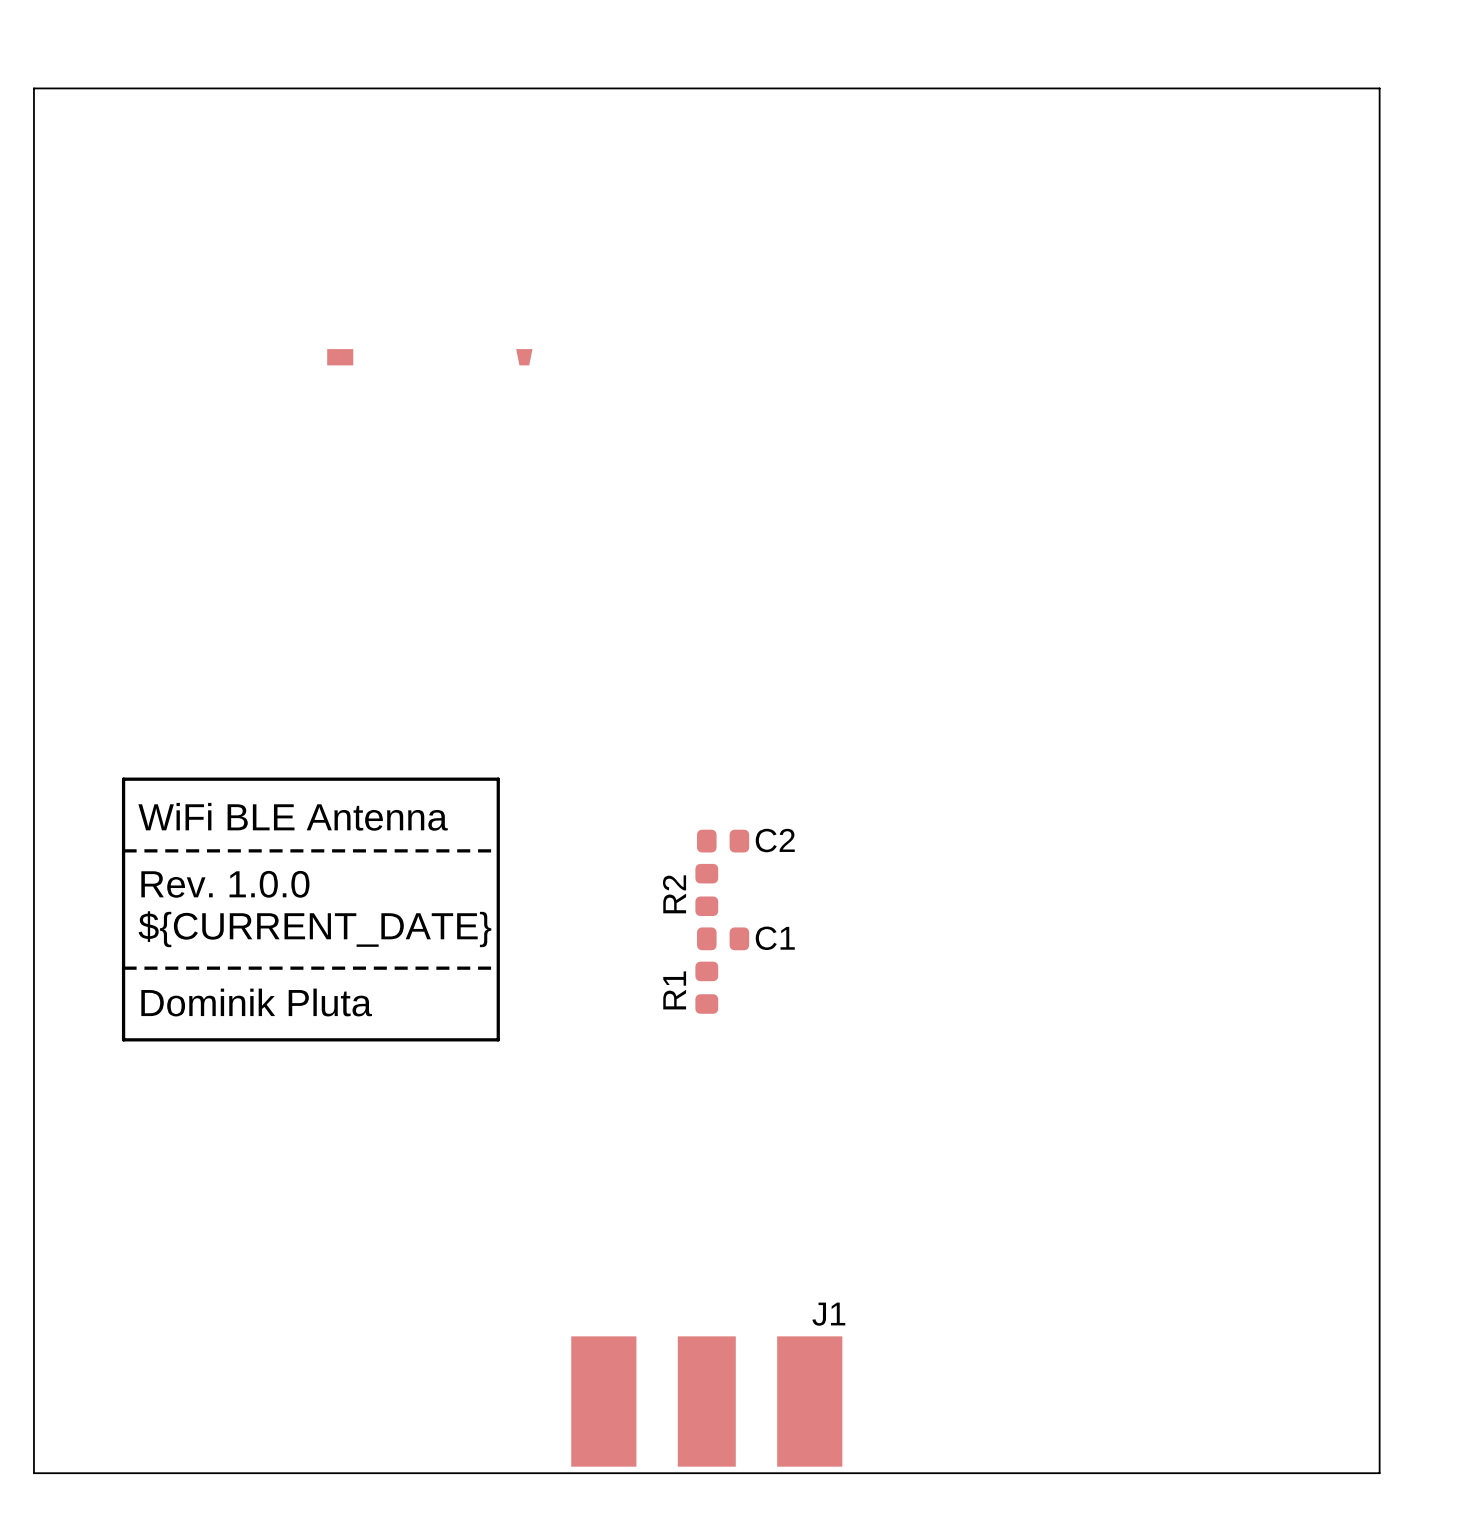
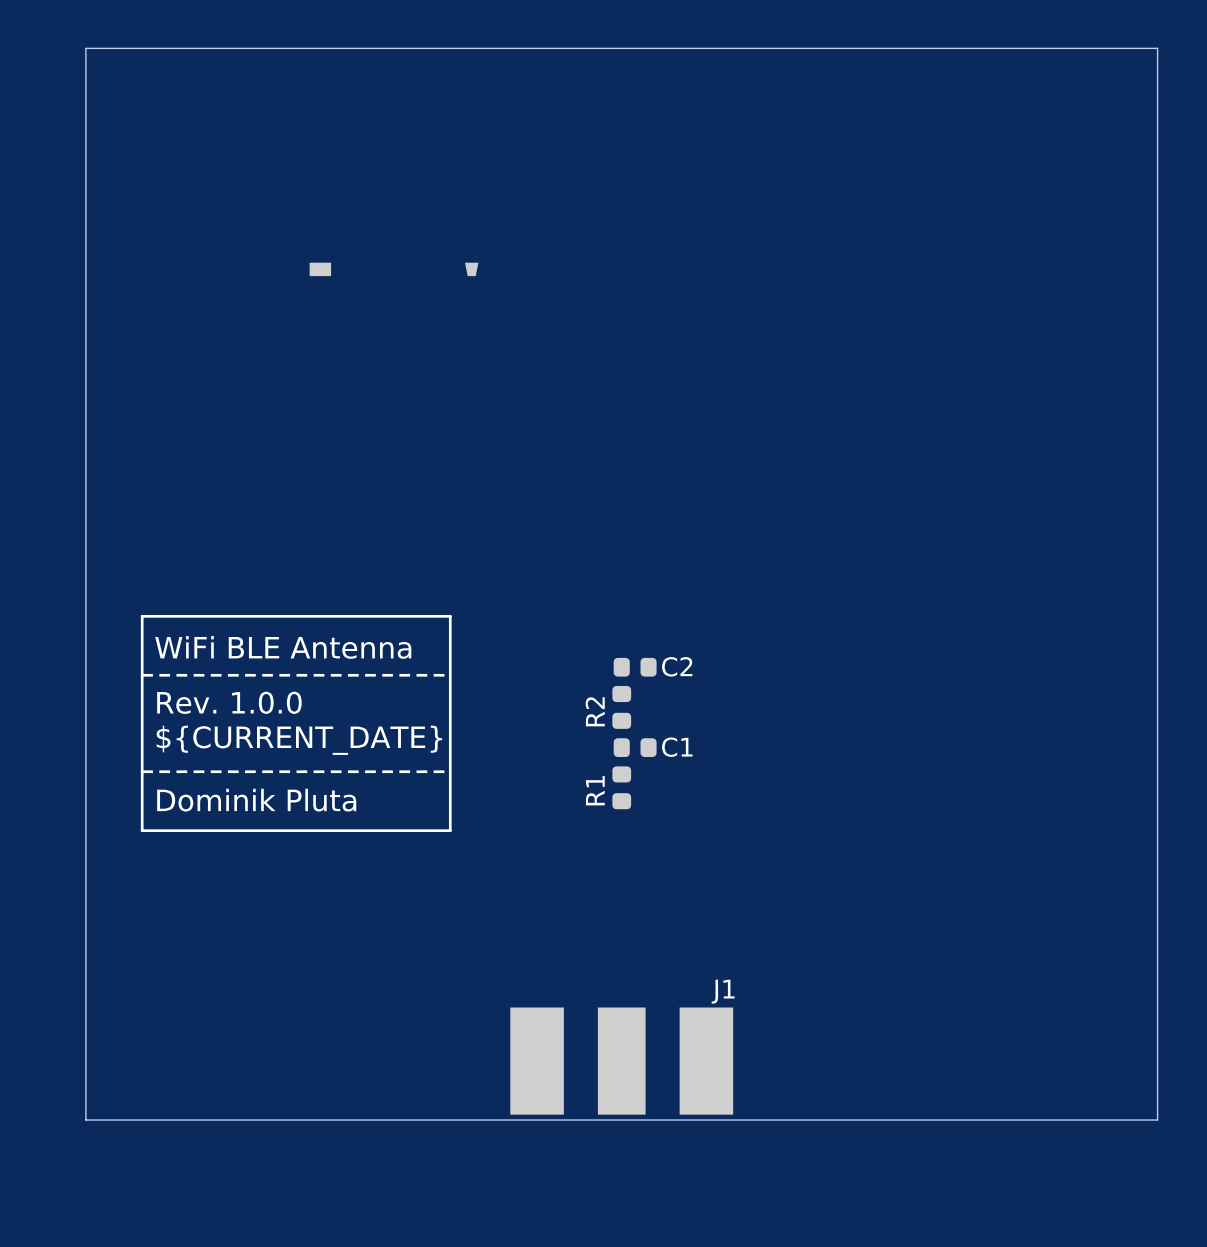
board edge: (55, 88) (33, 88) (33, 1473) (1379, 1473) (1379, 88) (1358, 88) -> (85, 48) (85, 1120) (1157, 1120) (1157, 48)
J1 position: (706, 1401) -> (621, 1061)

